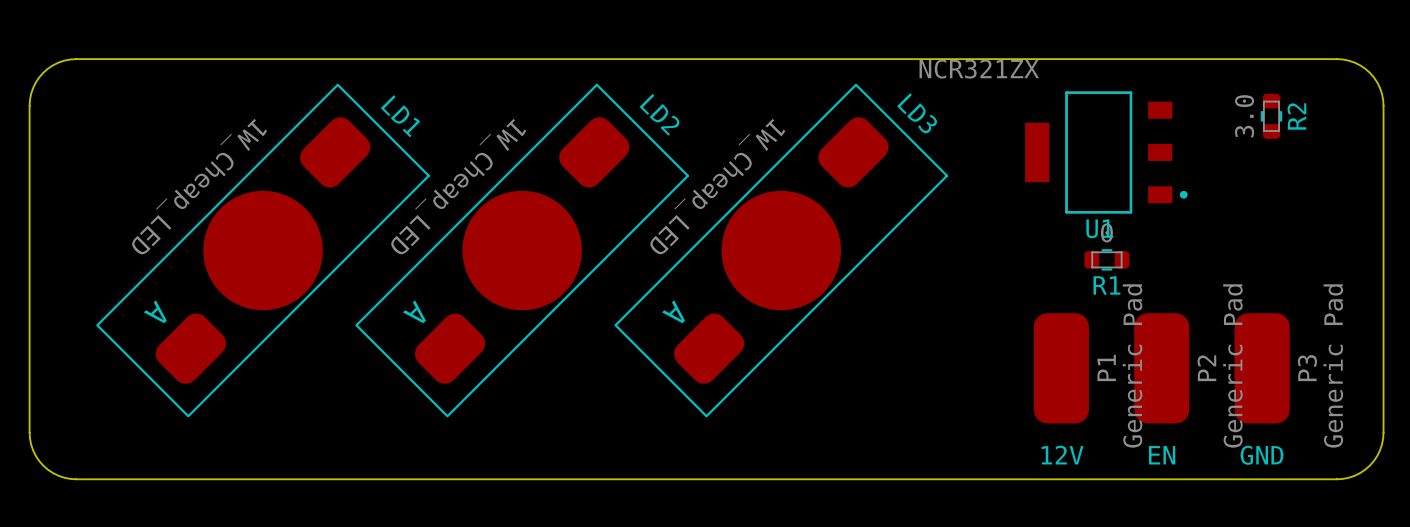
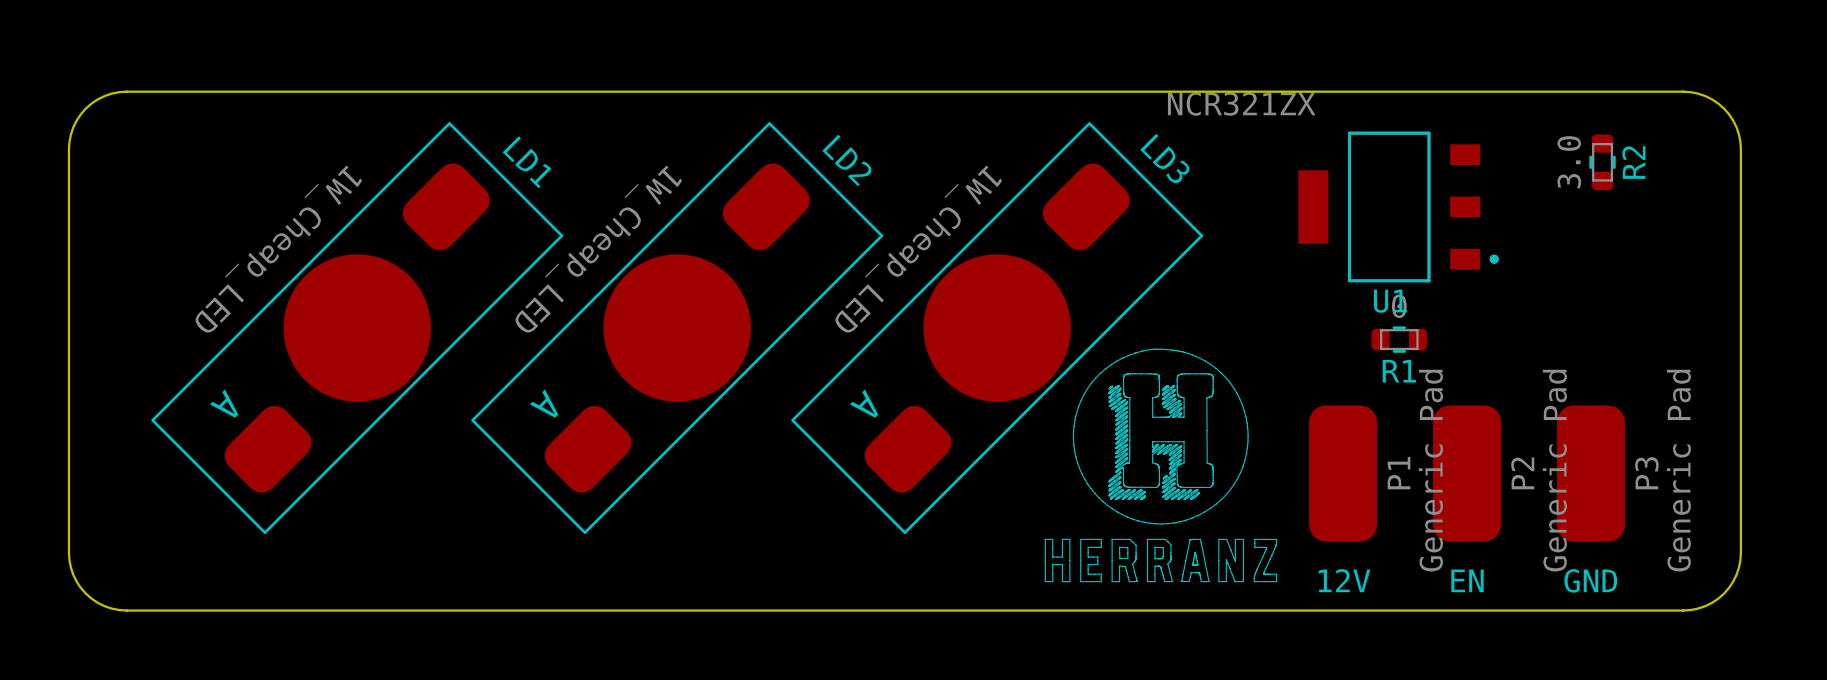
line: none -> (1153, 349) (1184, 352) (1198, 357) (1216, 368) (1225, 377) (1236, 393) (1244, 410) (1247, 429) (1247, 448) (1242, 466) (1234, 484) (1226, 494) (1210, 508) (1198, 515) (1167, 523) (1150, 523) (1132, 519) (1117, 511) (1103, 501) (1091, 488) (1082, 473) (1073, 445) (1076, 412) (1081, 400) (1091, 382) (1105, 368) (1116, 361) (1135, 352) (1153, 349)
line: none -> (1157, 374) (1125, 374)
line: none -> (1211, 374) (1178, 375)
line: none -> (1123, 376) (1123, 393)
line: none -> (1177, 376) (1177, 392)
line: none -> (1212, 376) (1212, 395)
line: none -> (1159, 378) (1158, 395)
line: none -> (1117, 386) (1111, 390)
line: none -> (1172, 386) (1164, 392)
line: none -> (1174, 386) (1163, 394)
line: none -> (1115, 388) (1110, 392)
line: none -> (1119, 388) (1110, 395)
line: none -> (1166, 387) (1164, 389)
line: none -> (1174, 389) (1164, 397)
line: none -> (1174, 390) (1163, 399)
line: none -> (1117, 392) (1110, 397)
line: none -> (1118, 394) (1110, 400)
line: none -> (1119, 395) (1111, 401)
line: none -> (1174, 394) (1163, 402)
line: none -> (1174, 395) (1163, 403)
line: none -> (1158, 396) (1152, 397) (1152, 417) (1169, 416)
line: none -> (1211, 396) (1206, 397) (1207, 463) (1210, 464)
line: none -> (1127, 397) (1129, 397) (1129, 460)
line: none -> (1180, 396) (1184, 398) (1184, 417) (1178, 417) (1179, 415)
line: none -> (1120, 397) (1110, 404)
line: none -> (1121, 398) (1110, 406)
line: none -> (1174, 399) (1164, 406)
line: none -> (1124, 399) (1113, 407)
line: none -> (1175, 399) (1164, 407)
line: none -> (1125, 400) (1112, 409)
line: none -> (1179, 400) (1167, 409)
line: none -> (1180, 401) (1167, 409)
line: none -> (1126, 402) (1117, 409)
line: none -> (1126, 403) (1117, 410)
line: none -> (1179, 404) (1172, 409)
line: none -> (1181, 404) (1170, 413)
line: none -> (1126, 407) (1116, 414)
line: none -> (1126, 408) (1117, 415)
line: none -> (1180, 408) (1170, 416)
line: none -> (1181, 409) (1173, 415)
line: none -> (1126, 412) (1116, 419)
line: none -> (1126, 413) (1117, 419)
line: none -> (1178, 414) (1177, 415)
line: none -> (1126, 416) (1117, 422)
line: none -> (1127, 417) (1116, 424)
line: none -> (1126, 421) (1117, 427)
line: none -> (1127, 421) (1116, 429)
line: none -> (1126, 425) (1117, 432)
line: none -> (1126, 427) (1117, 434)
line: none -> (1126, 430) (1117, 437)
line: none -> (1126, 432) (1117, 438)
line: none -> (1126, 434) (1117, 441)
line: none -> (1126, 436) (1117, 443)
line: none -> (1126, 439) (1117, 446)
line: none -> (1126, 440) (1117, 447)
line: none -> (1126, 444) (1116, 451)
line: none -> (1176, 444) (1165, 451)
line: none -> (1126, 445) (1117, 452)
line: none -> (1152, 445) (1152, 441) (1184, 441) (1184, 462) (1181, 463)
line: none -> (1161, 445) (1154, 450)
line: none -> (1169, 444) (1157, 453)
line: none -> (1171, 445) (1158, 454)
line: none -> (1176, 445) (1164, 454)
line: none -> (1162, 446) (1152, 454) (1152, 462) (1155, 463)
line: none -> (1180, 446) (1170, 453)
line: none -> (1155, 447) (1155, 447)
line: none -> (1180, 447) (1171, 454)
line: none -> (1126, 449) (1116, 456)
line: none -> (1127, 449) (1117, 457)
line: none -> (1180, 450) (1169, 459)
line: none -> (1180, 451) (1170, 459)
line: none -> (1126, 453) (1116, 462)
line: none -> (1127, 454) (1116, 462)
line: none -> (1180, 455) (1171, 461)
line: none -> (1181, 455) (1170, 464)
line: none -> (1126, 458) (1117, 465)
line: none -> (1127, 458) (1116, 467)
line: none -> (1179, 460) (1171, 466)
line: none -> (1180, 461) (1171, 468)
line: none -> (1126, 463) (1116, 470)
line: none -> (1178, 465) (1177, 485)
line: none -> (1122, 467) (1118, 471)
line: none -> (1123, 467) (1123, 484)
line: none -> (1212, 468) (1212, 484)
line: none -> (1159, 468) (1159, 484)
line: none -> (1173, 469) (1172, 470)
line: none -> (1175, 468) (1175, 469)
line: none -> (1174, 470) (1171, 473)
line: none -> (1119, 472) (1110, 479)
line: none -> (1120, 473) (1109, 481)
line: none -> (1174, 473) (1164, 480)
line: none -> (1174, 474) (1163, 483)
line: none -> (1119, 477) (1111, 483)
line: none -> (1120, 477) (1109, 486)
line: none -> (1165, 477) (1164, 478)
line: none -> (1174, 478) (1163, 486)
line: none -> (1174, 479) (1163, 487)
line: none -> (1118, 482) (1110, 488)
line: none -> (1119, 483) (1111, 490)
line: none -> (1173, 483) (1165, 489)
line: none -> (1174, 483) (1163, 492)
line: none -> (1158, 485) (1156, 487) (1125, 486)
line: none -> (1212, 485) (1210, 487) (1179, 486)
line: none -> (1118, 487) (1110, 493)
line: none -> (1120, 487) (1109, 495)
line: none -> (1173, 488) (1163, 496)
line: none -> (1174, 488) (1164, 496)
line: none -> (1121, 489) (1112, 496)
line: none -> (1123, 490) (1111, 498)
line: none -> (1128, 489) (1117, 497)
line: none -> (1129, 490) (1116, 499)
line: none -> (1134, 490) (1123, 498)
line: none -> (1140, 489) (1130, 497)
line: none -> (1141, 490) (1129, 499)
line: none -> (1177, 489) (1167, 497)
line: none -> (1178, 490) (1166, 499)
line: none -> (1183, 490) (1172, 498)
line: none -> (1190, 490) (1180, 496)
line: none -> (1196, 489) (1185, 497)
line: none -> (1135, 490) (1122, 499)
line: none -> (1185, 490) (1172, 499)
line: none -> (1191, 490) (1178, 499)
line: none -> (1197, 490) (1184, 499)
line: none -> (1143, 491) (1136, 497)
line: none -> (1144, 492) (1135, 499)
line: none -> (1197, 493) (1192, 497)
line: none -> (1198, 494) (1191, 499)
line: none -> (1045, 539) (1052, 539) (1052, 557) (1062, 557) (1062, 539) (1069, 539) (1069, 581) (1062, 581) (1062, 564) (1052, 564) (1052, 581) (1045, 581) (1045, 539)
line: none -> (1080, 539) (1101, 539) (1101, 547) (1088, 547) (1088, 557) (1097, 557) (1097, 564) (1088, 564) (1088, 574) (1101, 574) (1101, 581) (1080, 581) (1080, 539)
line: none -> (1191, 539) (1200, 539) (1209, 581) (1201, 581) (1199, 574)
line: none -> (1218, 539) (1218, 581) (1226, 581) (1226, 559) (1235, 581) (1243, 581) (1243, 539) (1235, 539) (1235, 561) (1226, 539) (1218, 539)
line: none -> (1190, 540) (1181, 581)
line: none -> (1119, 547) (1127, 547) (1127, 558) (1119, 558) (1119, 547)
line: none -> (1265, 547) (1254, 547) (1254, 539) (1276, 539) (1275, 547) (1263, 573)
line: none -> (1266, 548) (1255, 573) (1254, 581) (1276, 581) (1276, 574) (1264, 574)
line: none -> (1195, 553) (1192, 564)
line: none -> (1195, 553) (1197, 563)
line: none -> (1163, 556) (1163, 547) (1154, 547) (1154, 558) (1161, 558)
line: none -> (1136, 557) (1136, 545) (1130, 539) (1112, 539) (1112, 581) (1119, 581) (1119, 566) (1125, 566) (1129, 581) (1135, 581)
line: none -> (1170, 557) (1170, 544) (1165, 539) (1147, 539) (1147, 581) (1154, 581) (1154, 566) (1158, 566)
line: none -> (1134, 561) (1132, 564) (1137, 580)
line: none -> (1169, 562) (1167, 563) (1172, 581) (1164, 581) (1161, 568)
line: none -> (1197, 572) (1191, 572) (1189, 581) (1185, 581)

